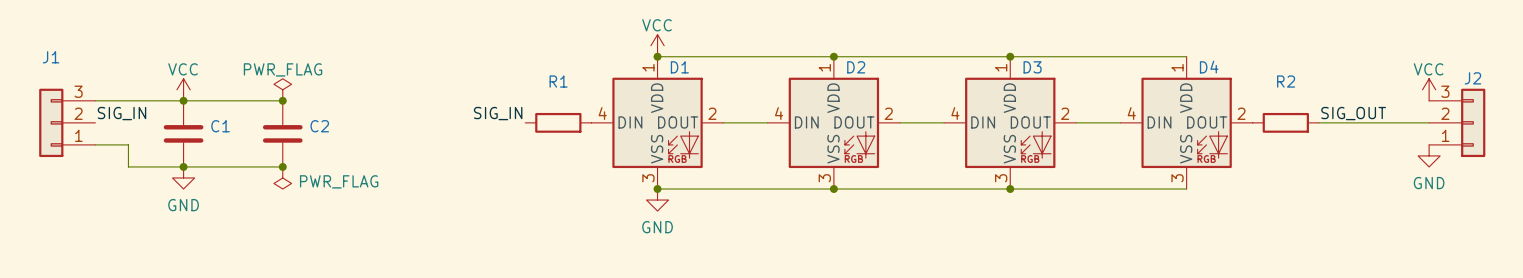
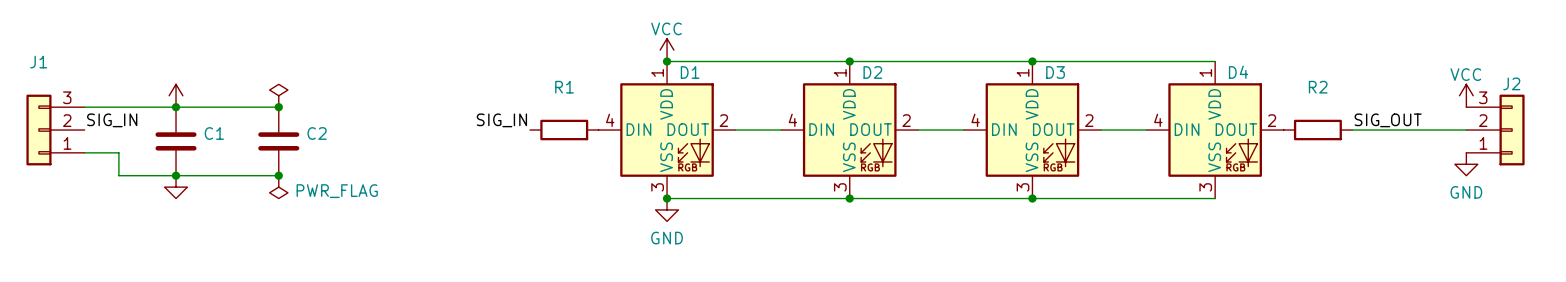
power symbol text: VCC (183, 69) -> none
power symbol text: PWR_FLAG (283, 69) -> none
power symbol text: GND (183, 205) -> none

